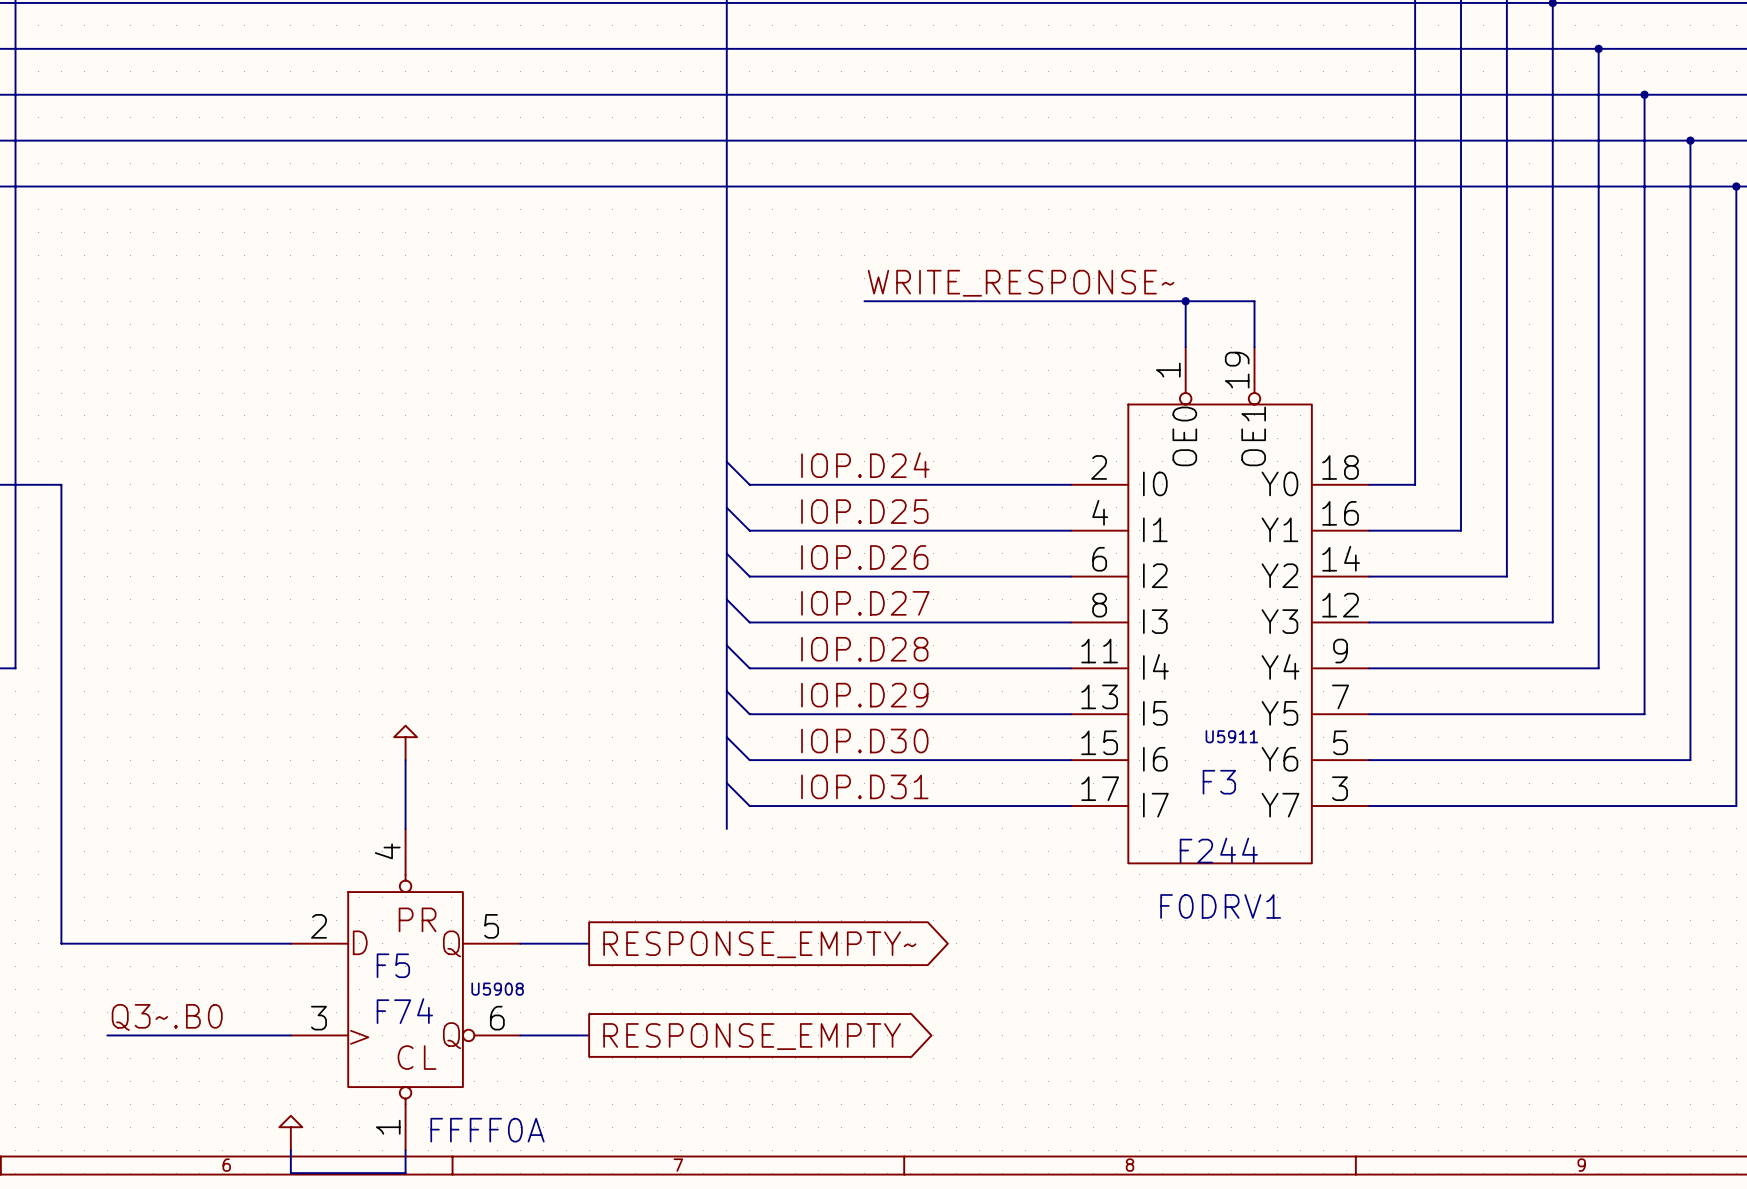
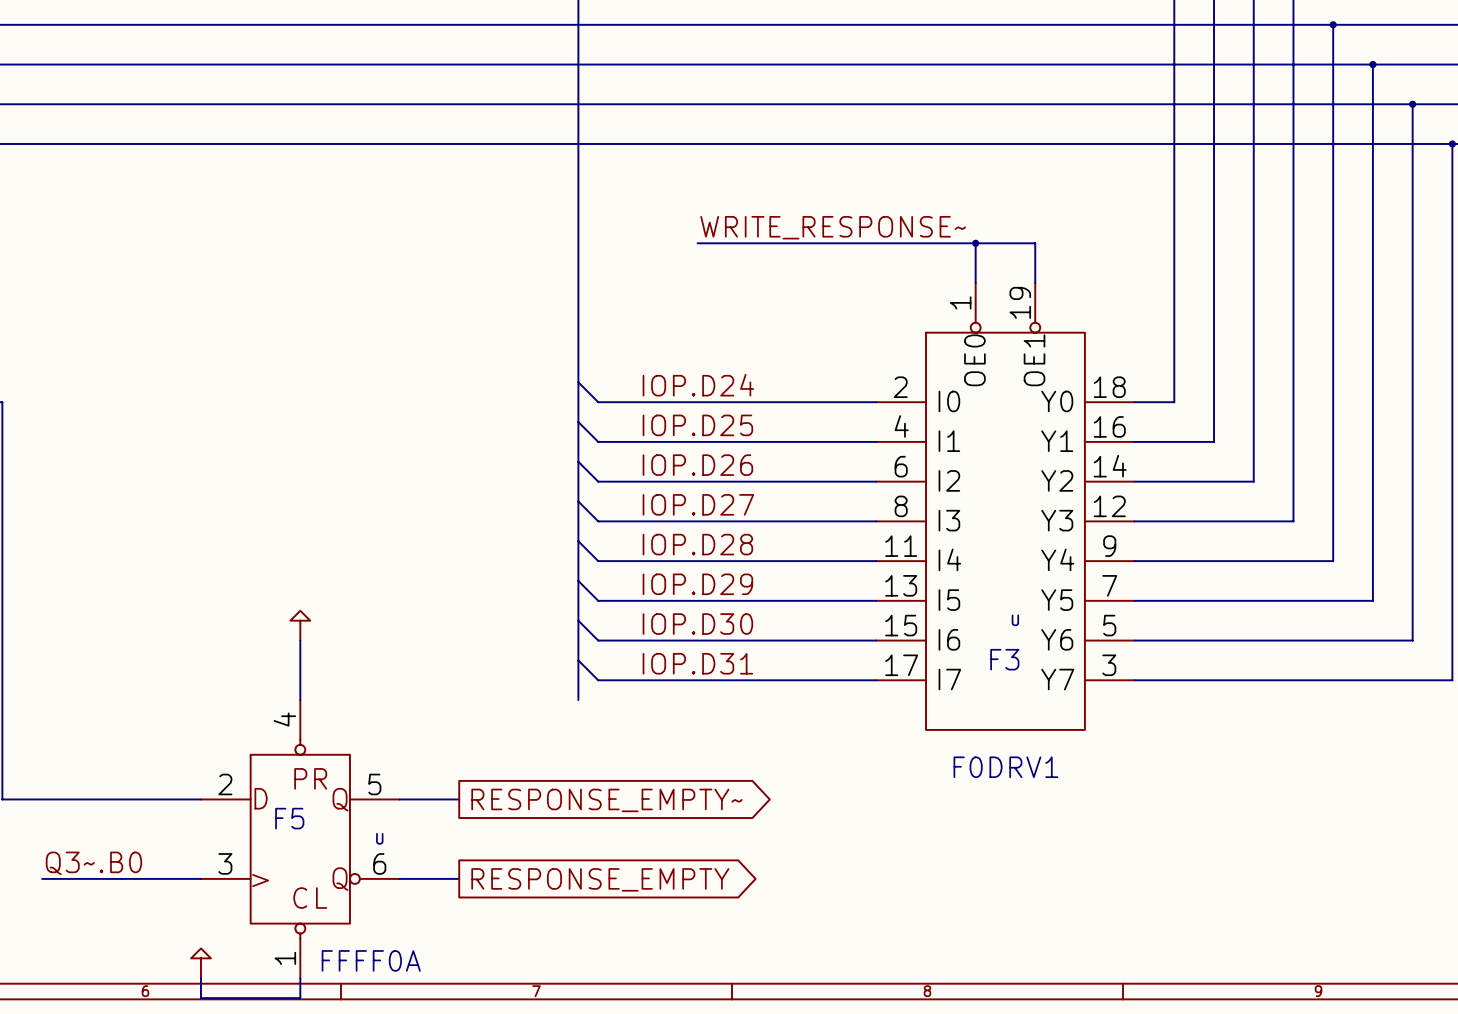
U5911 name: U5911 (1231, 736) -> U (1015, 620)
U5911 value: F244 (1218, 850) -> none
U5908 name: U5908 (497, 989) -> U (379, 838)
U5908 value: F74 (404, 1011) -> none

